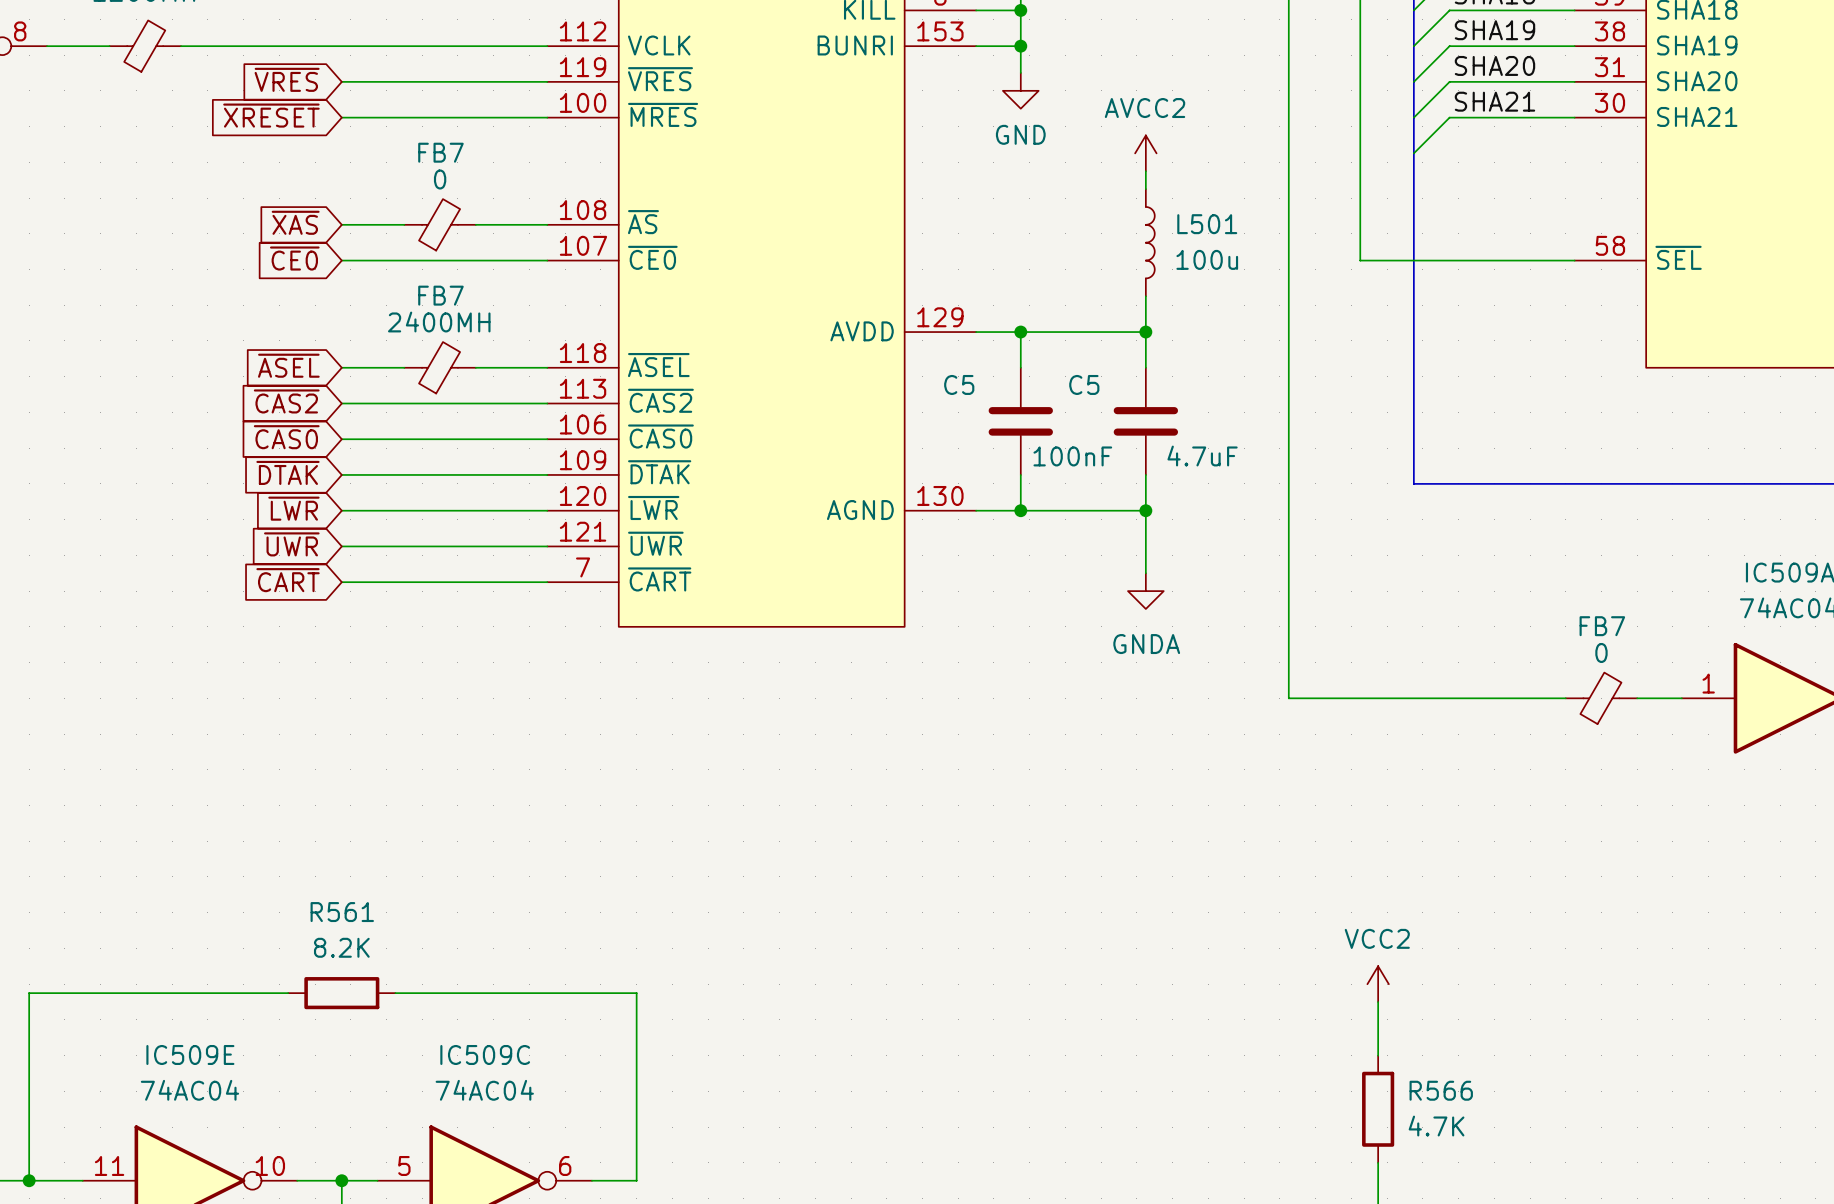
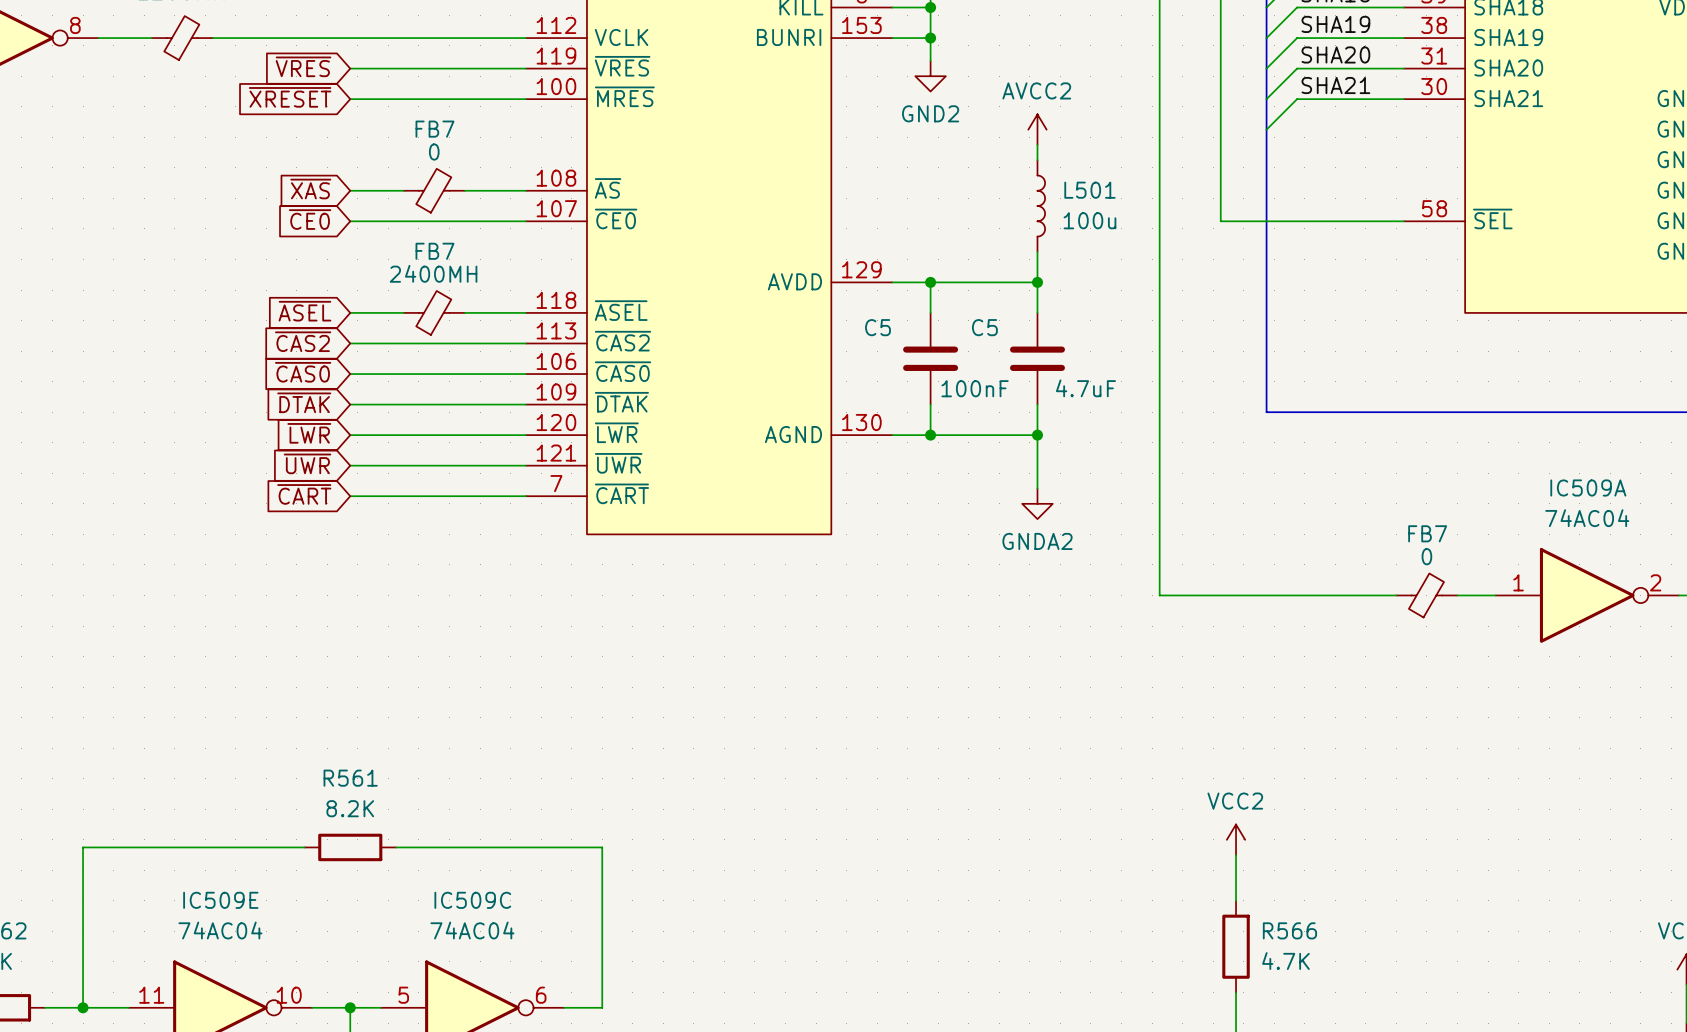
power symbol: GND (1020, 90) -> GND2 (930, 76)
power symbol: GNDA (1145, 591) -> GNDA2 (1037, 503)

